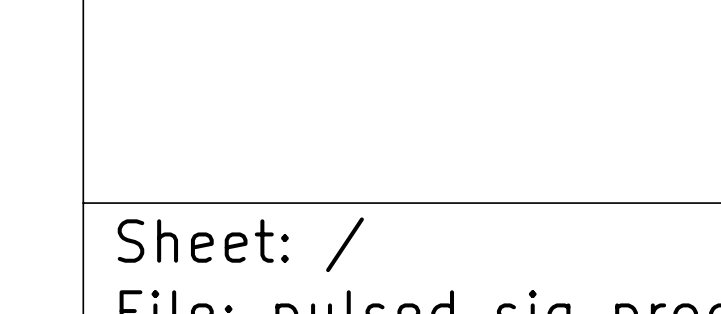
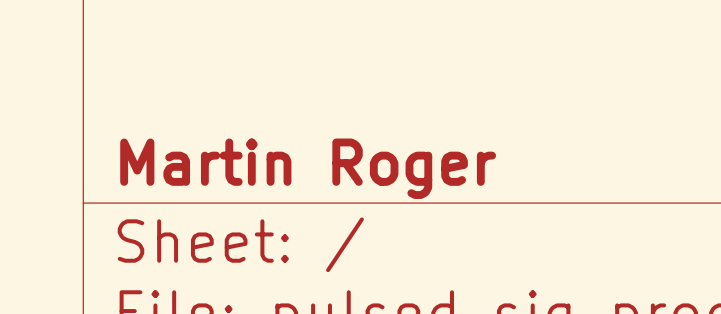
title block: none -> Martin Roger (308, 168)

